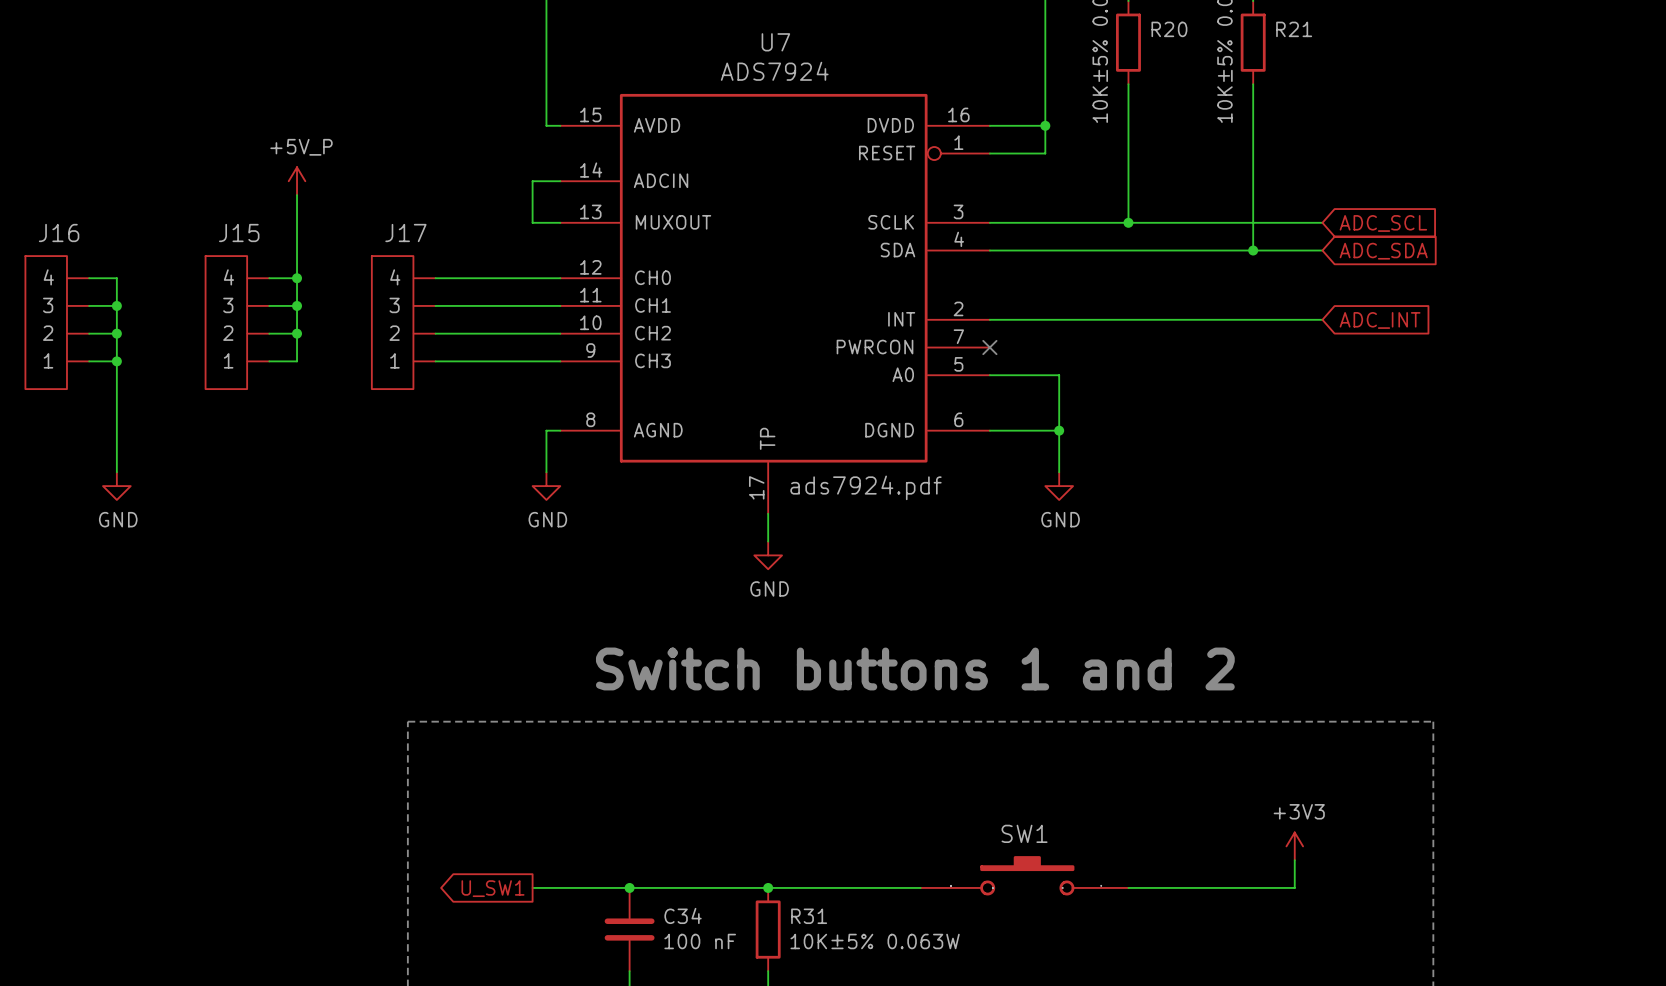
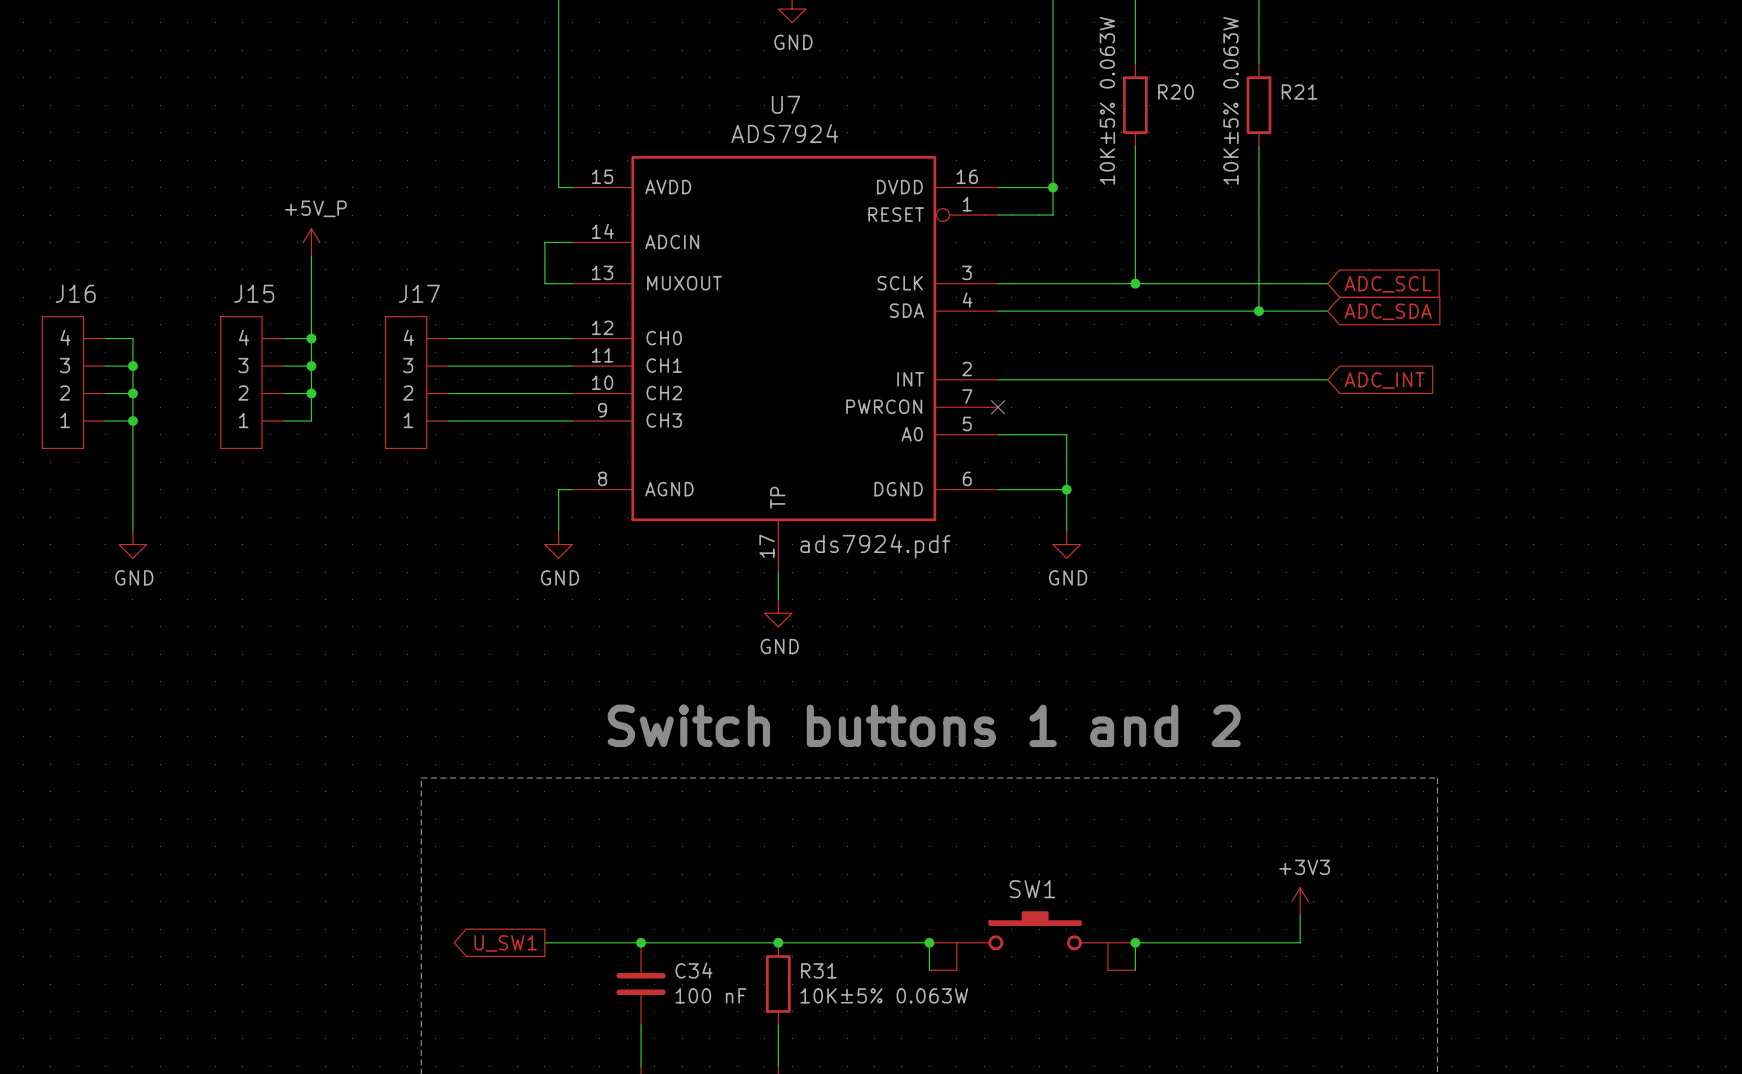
SW1 symbol: [920, 856, 1129, 896] -> [929, 911, 1136, 971]
wire: none -> (929, 942) (929, 970)
junction: none -> (929, 942)
wire: none -> (1135, 942) (1135, 970)
junction: none -> (1135, 942)

